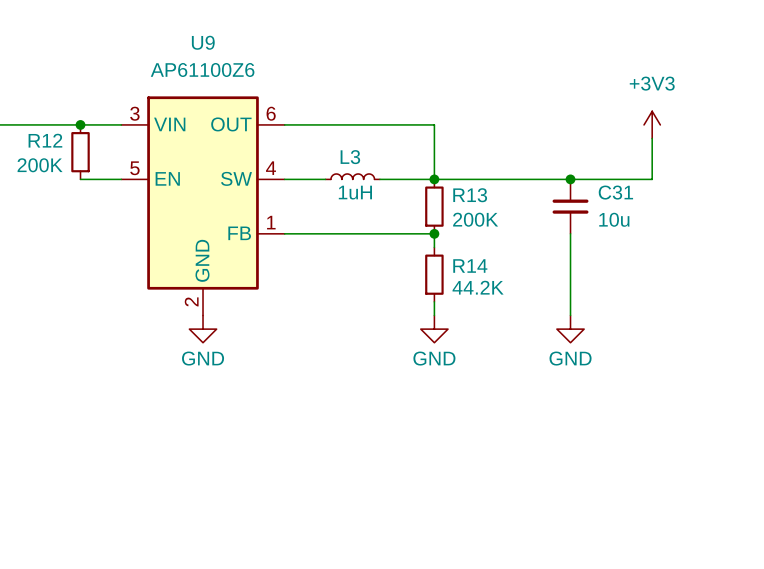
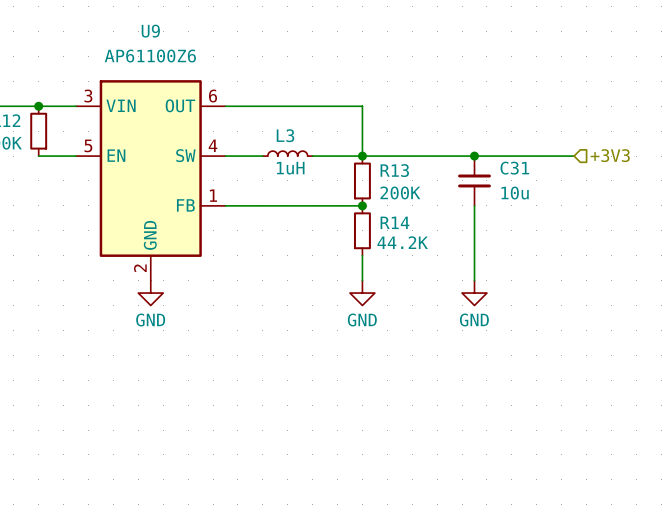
power symbol: +3V3 (652, 124) -> none
wire: (652, 138) (652, 179) -> (574, 156) (561, 156)
hierarchical label: none -> +3V3 (610, 155)
junction position: (570, 179) -> (474, 156)
C31 position: (570, 206) -> (474, 180)
wire: (570, 233) (570, 315) -> (474, 205) (474, 280)
R14 position: (434, 274) -> (362, 230)
power symbol position: GND (570, 329) -> GND (474, 293)

